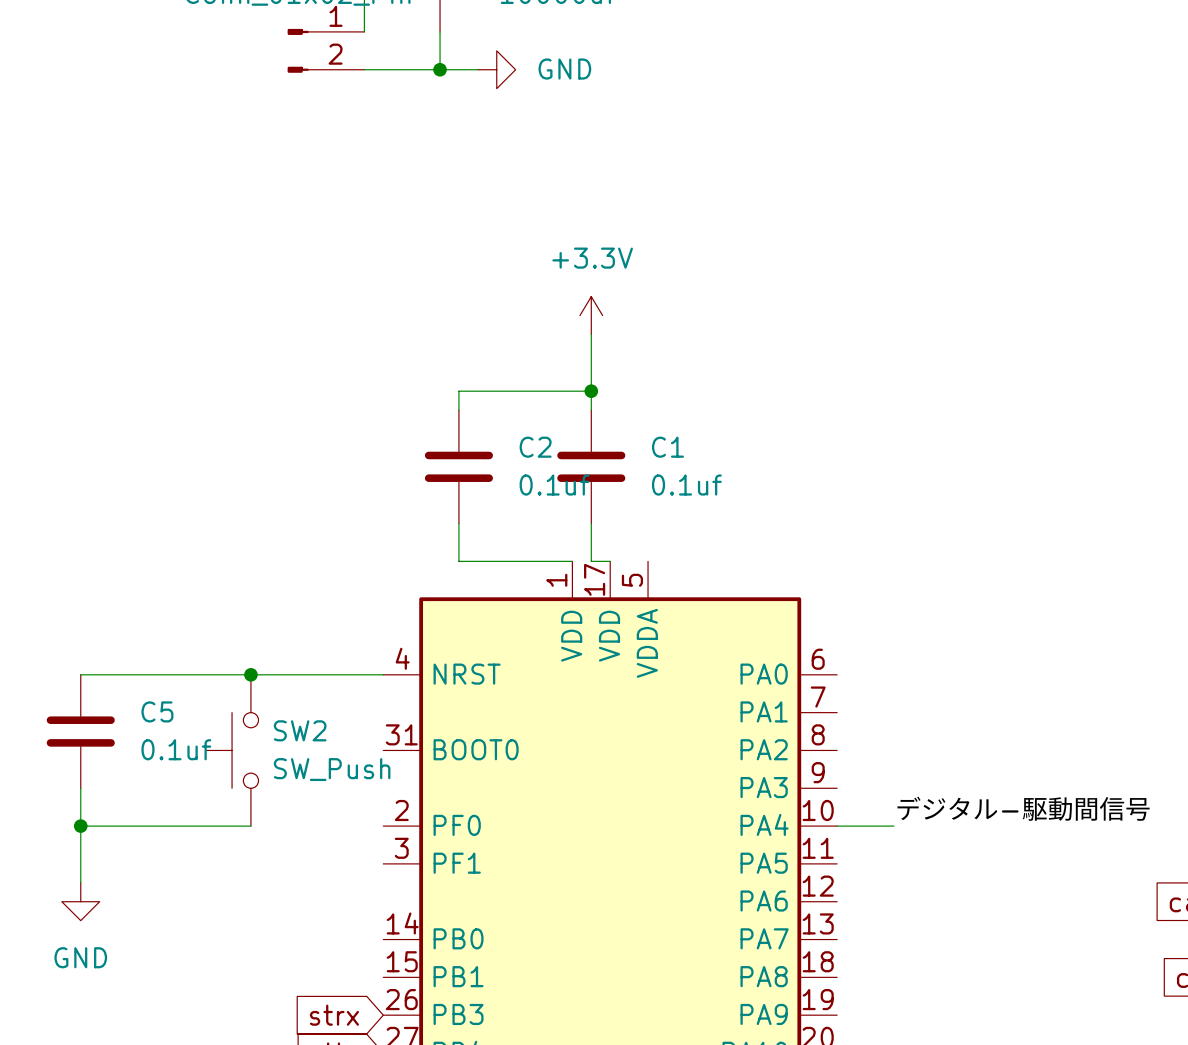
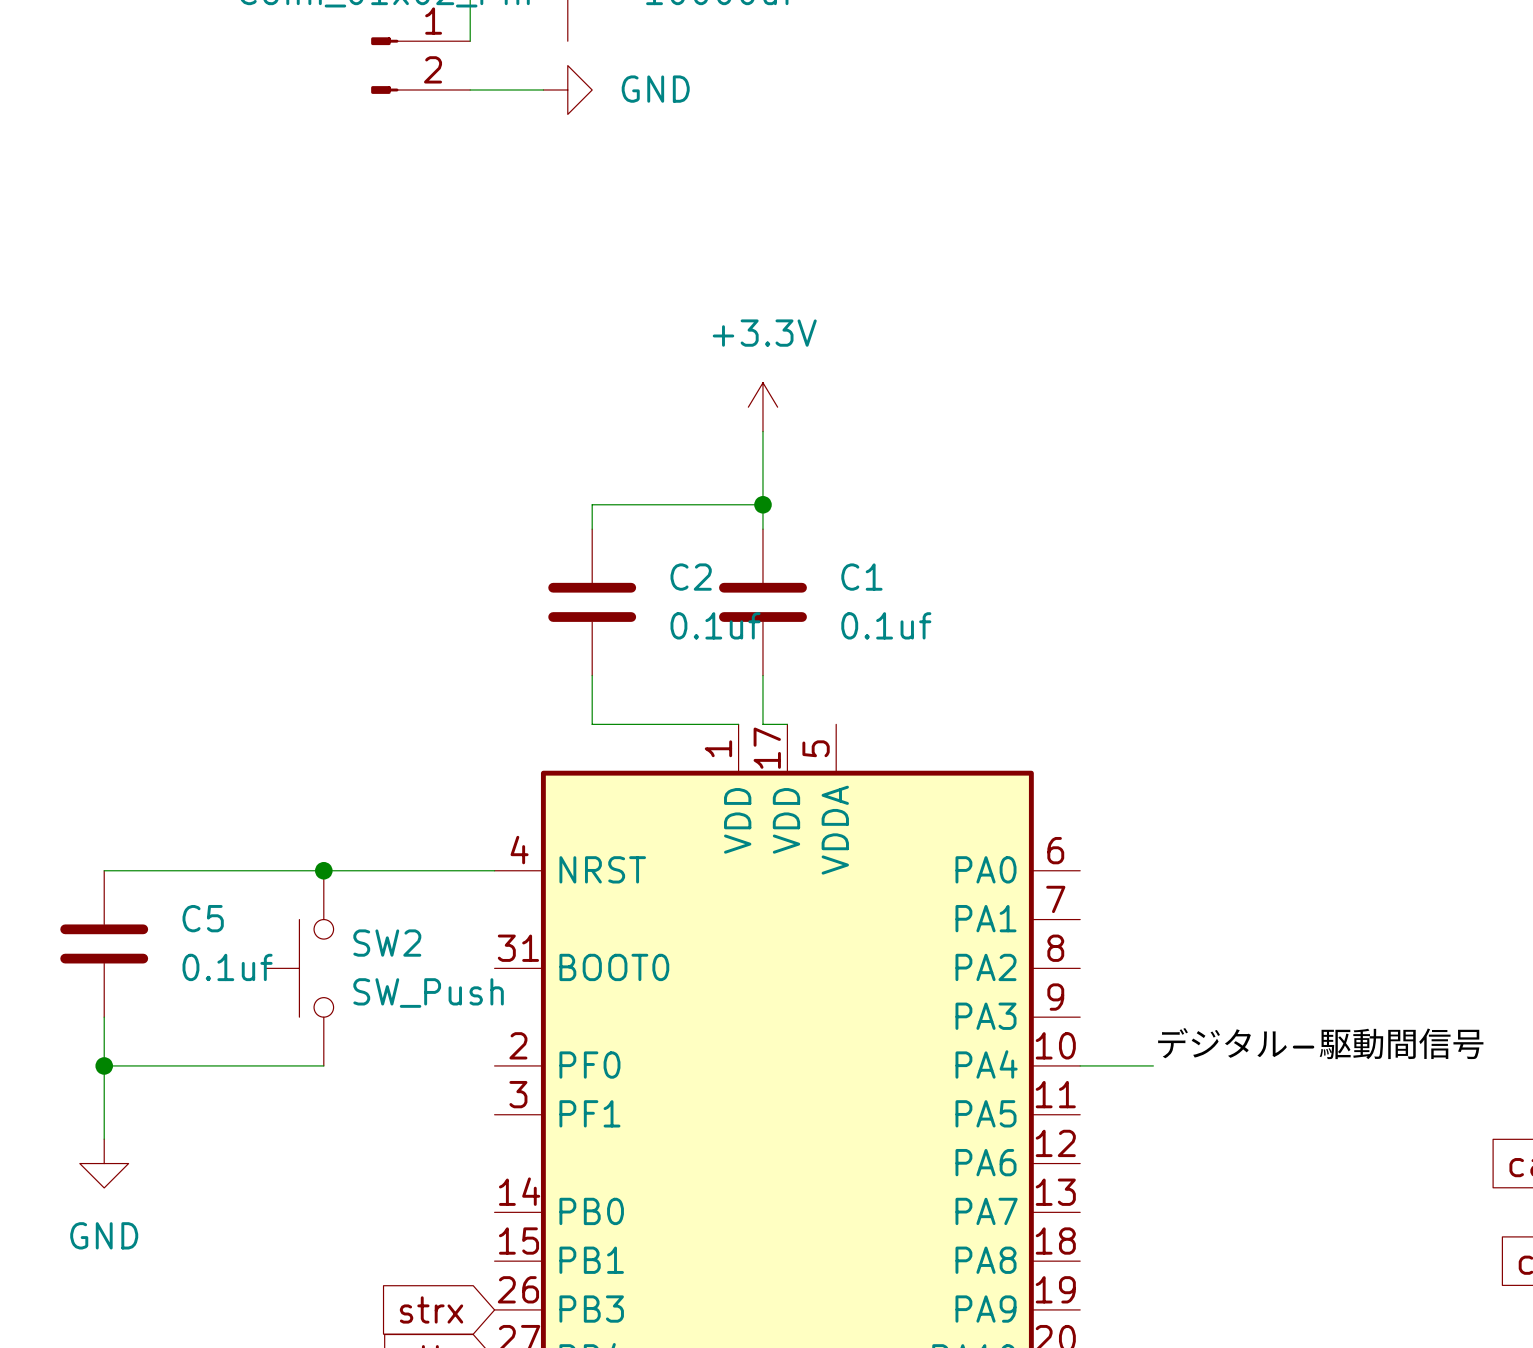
wire: (440, 31) (440, 69) -> none
wire: (421, 69) (477, 69) -> none
junction: (440, 69) -> none
power symbol position: GND (496, 69) -> GND (567, 90)

